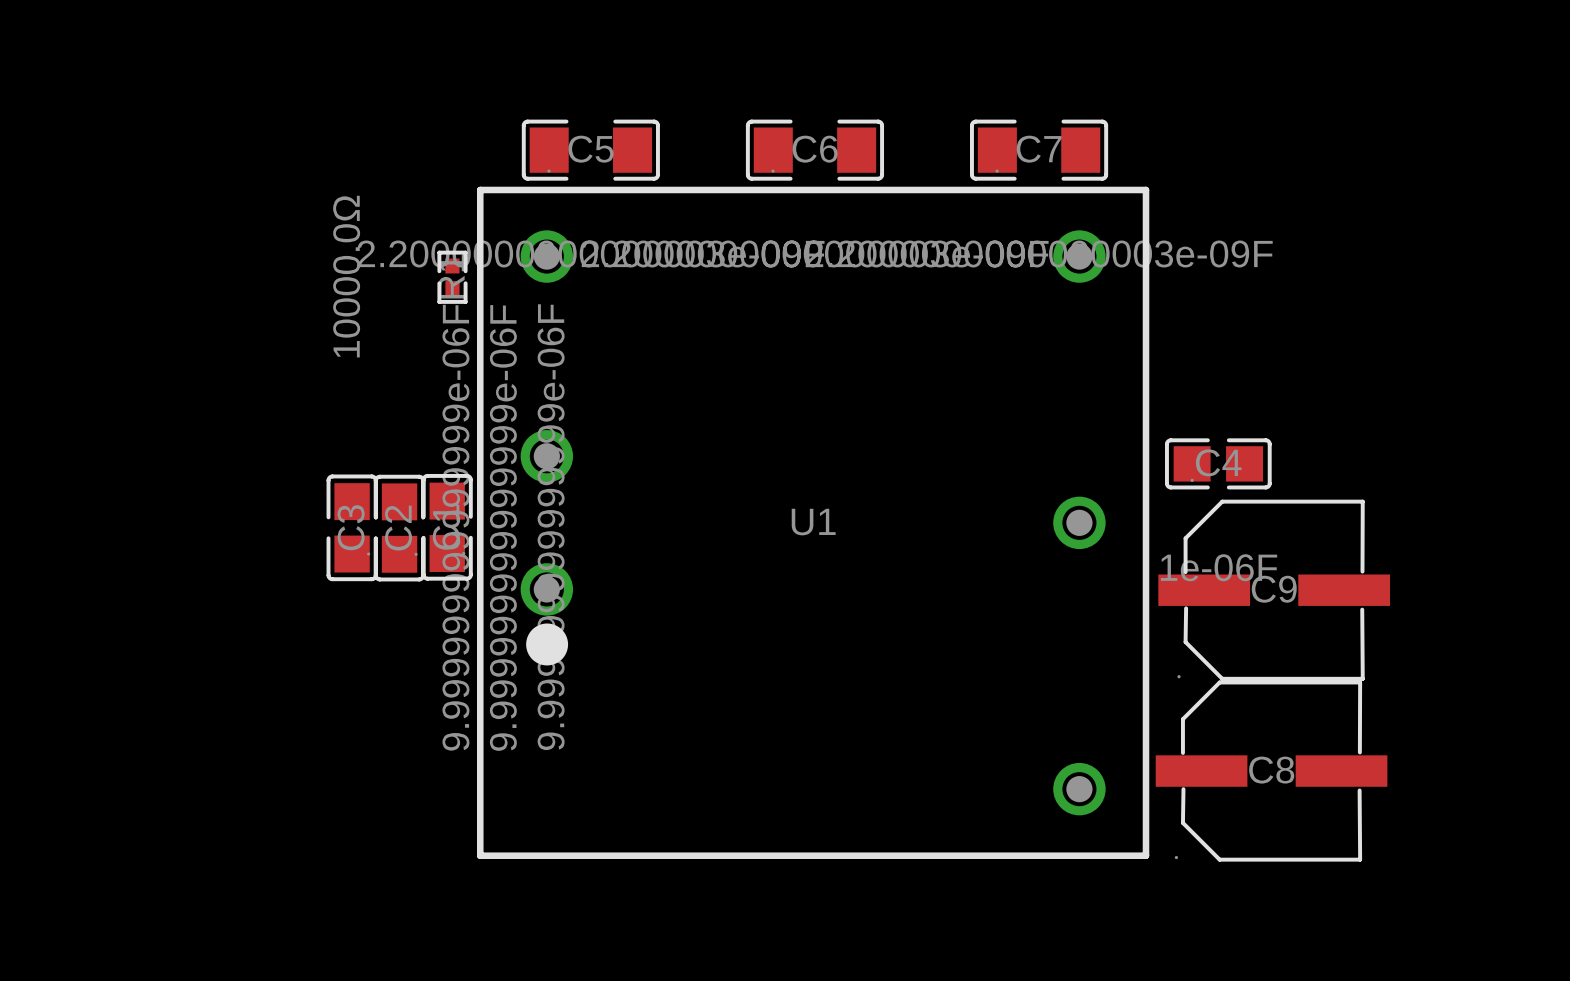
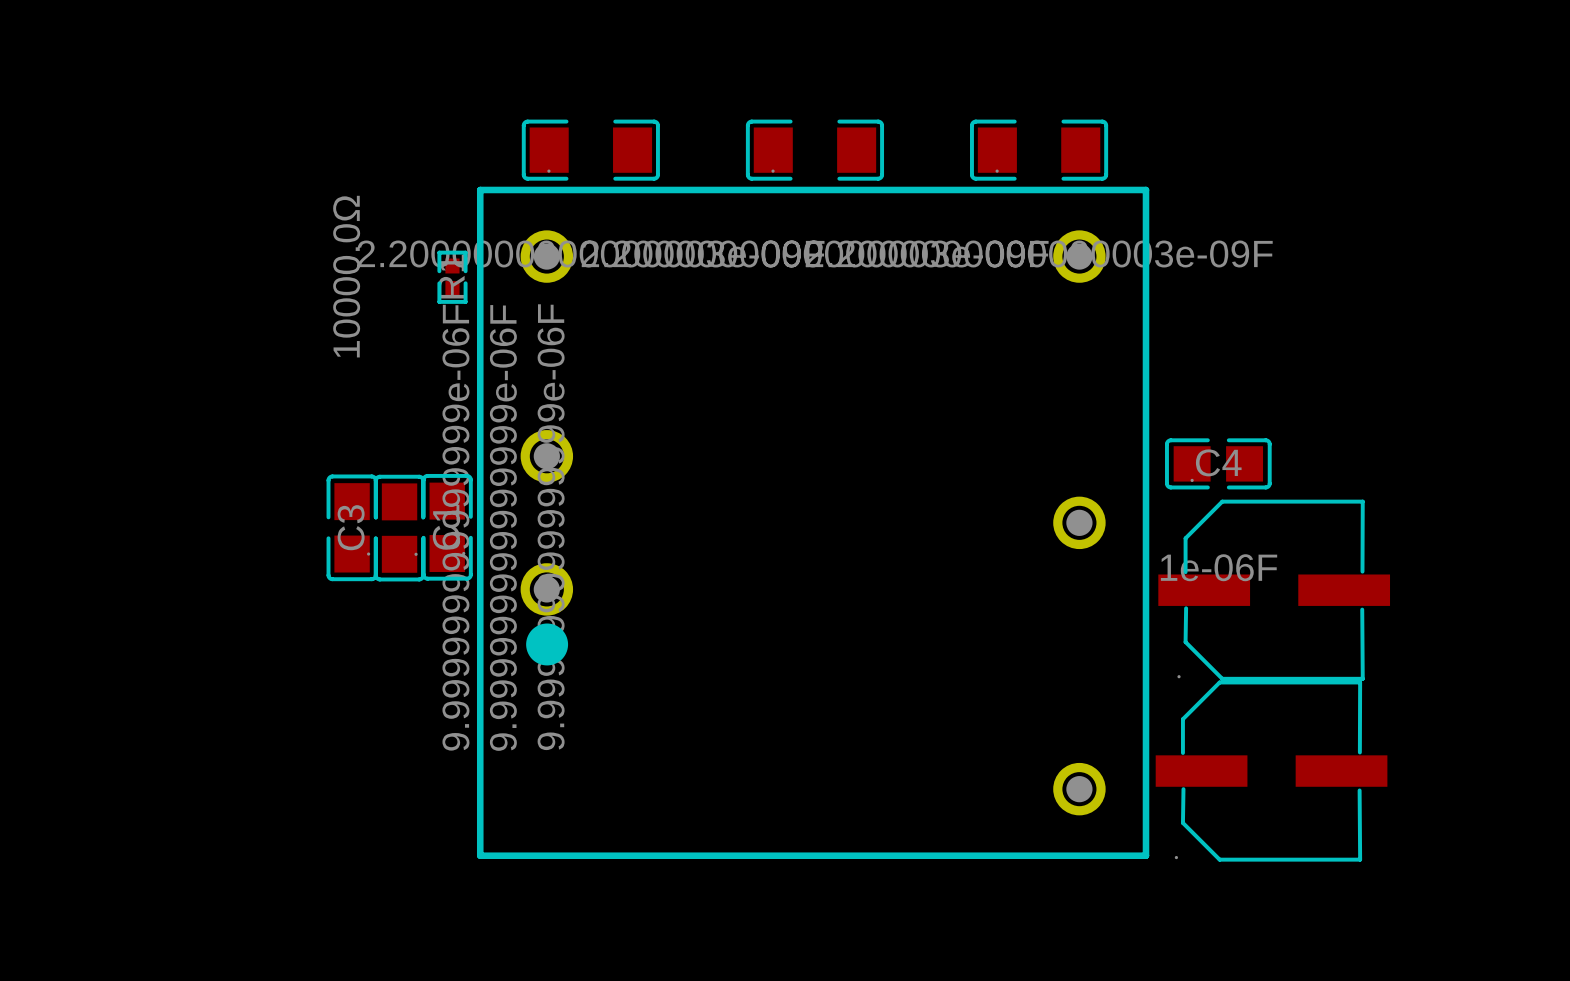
C5 name: C5 (591, 149) -> none
C6 name: C6 (815, 149) -> none
C7 name: C7 (1039, 149) -> none
U1 name: U1 (813, 522) -> none
C2 name: C2 (398, 528) -> none
C9 name: C9 (1274, 589) -> none
C8 name: C8 (1271, 770) -> none

